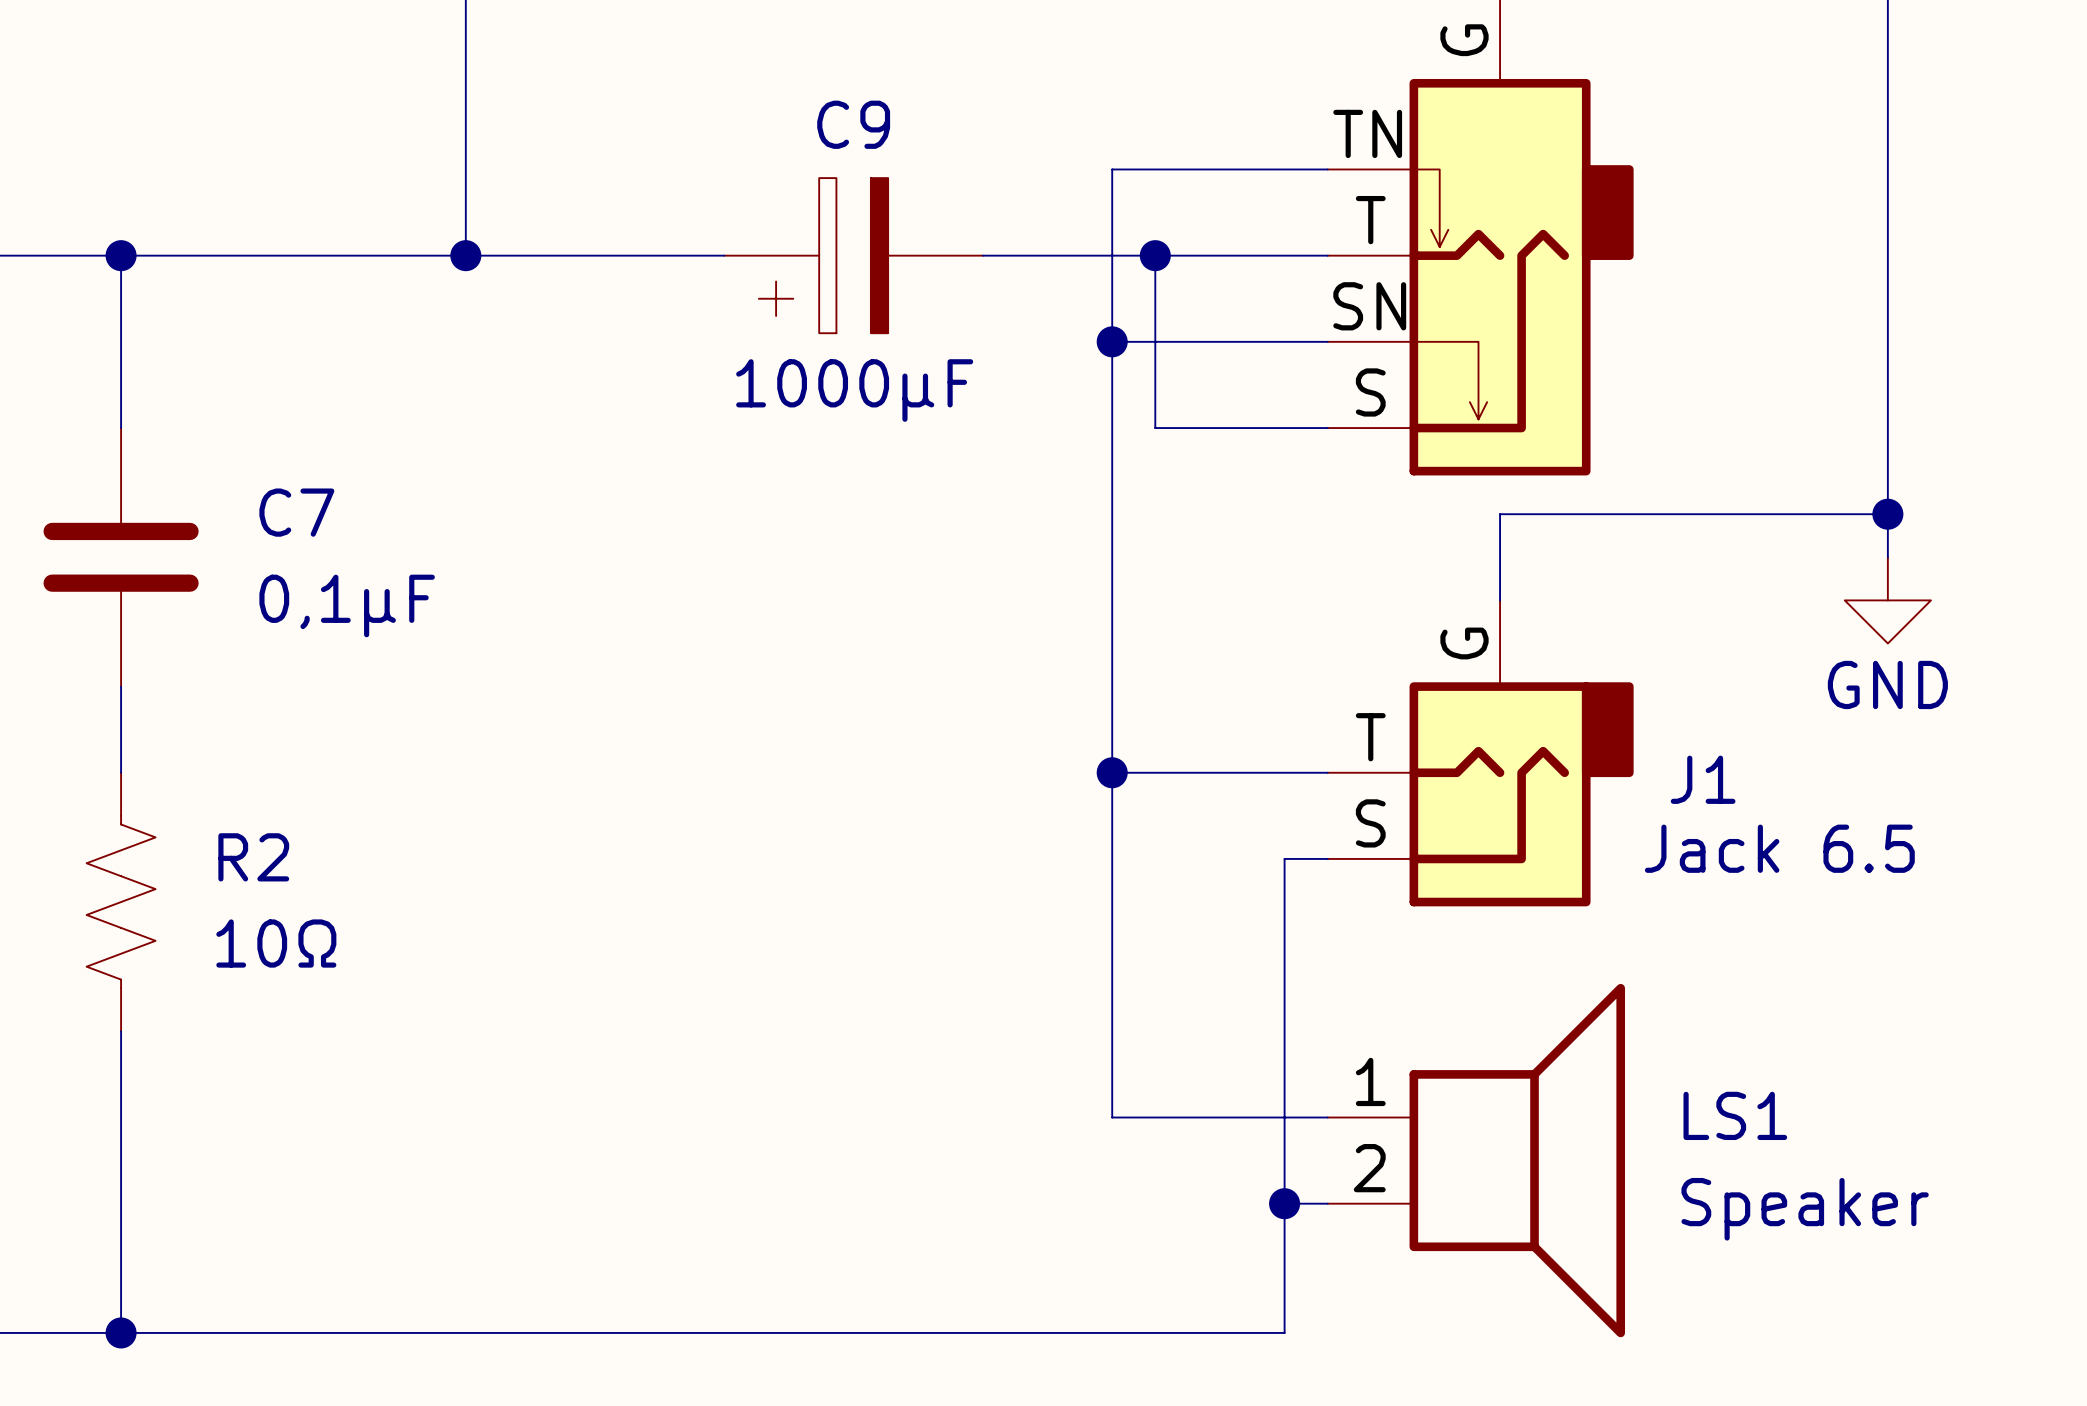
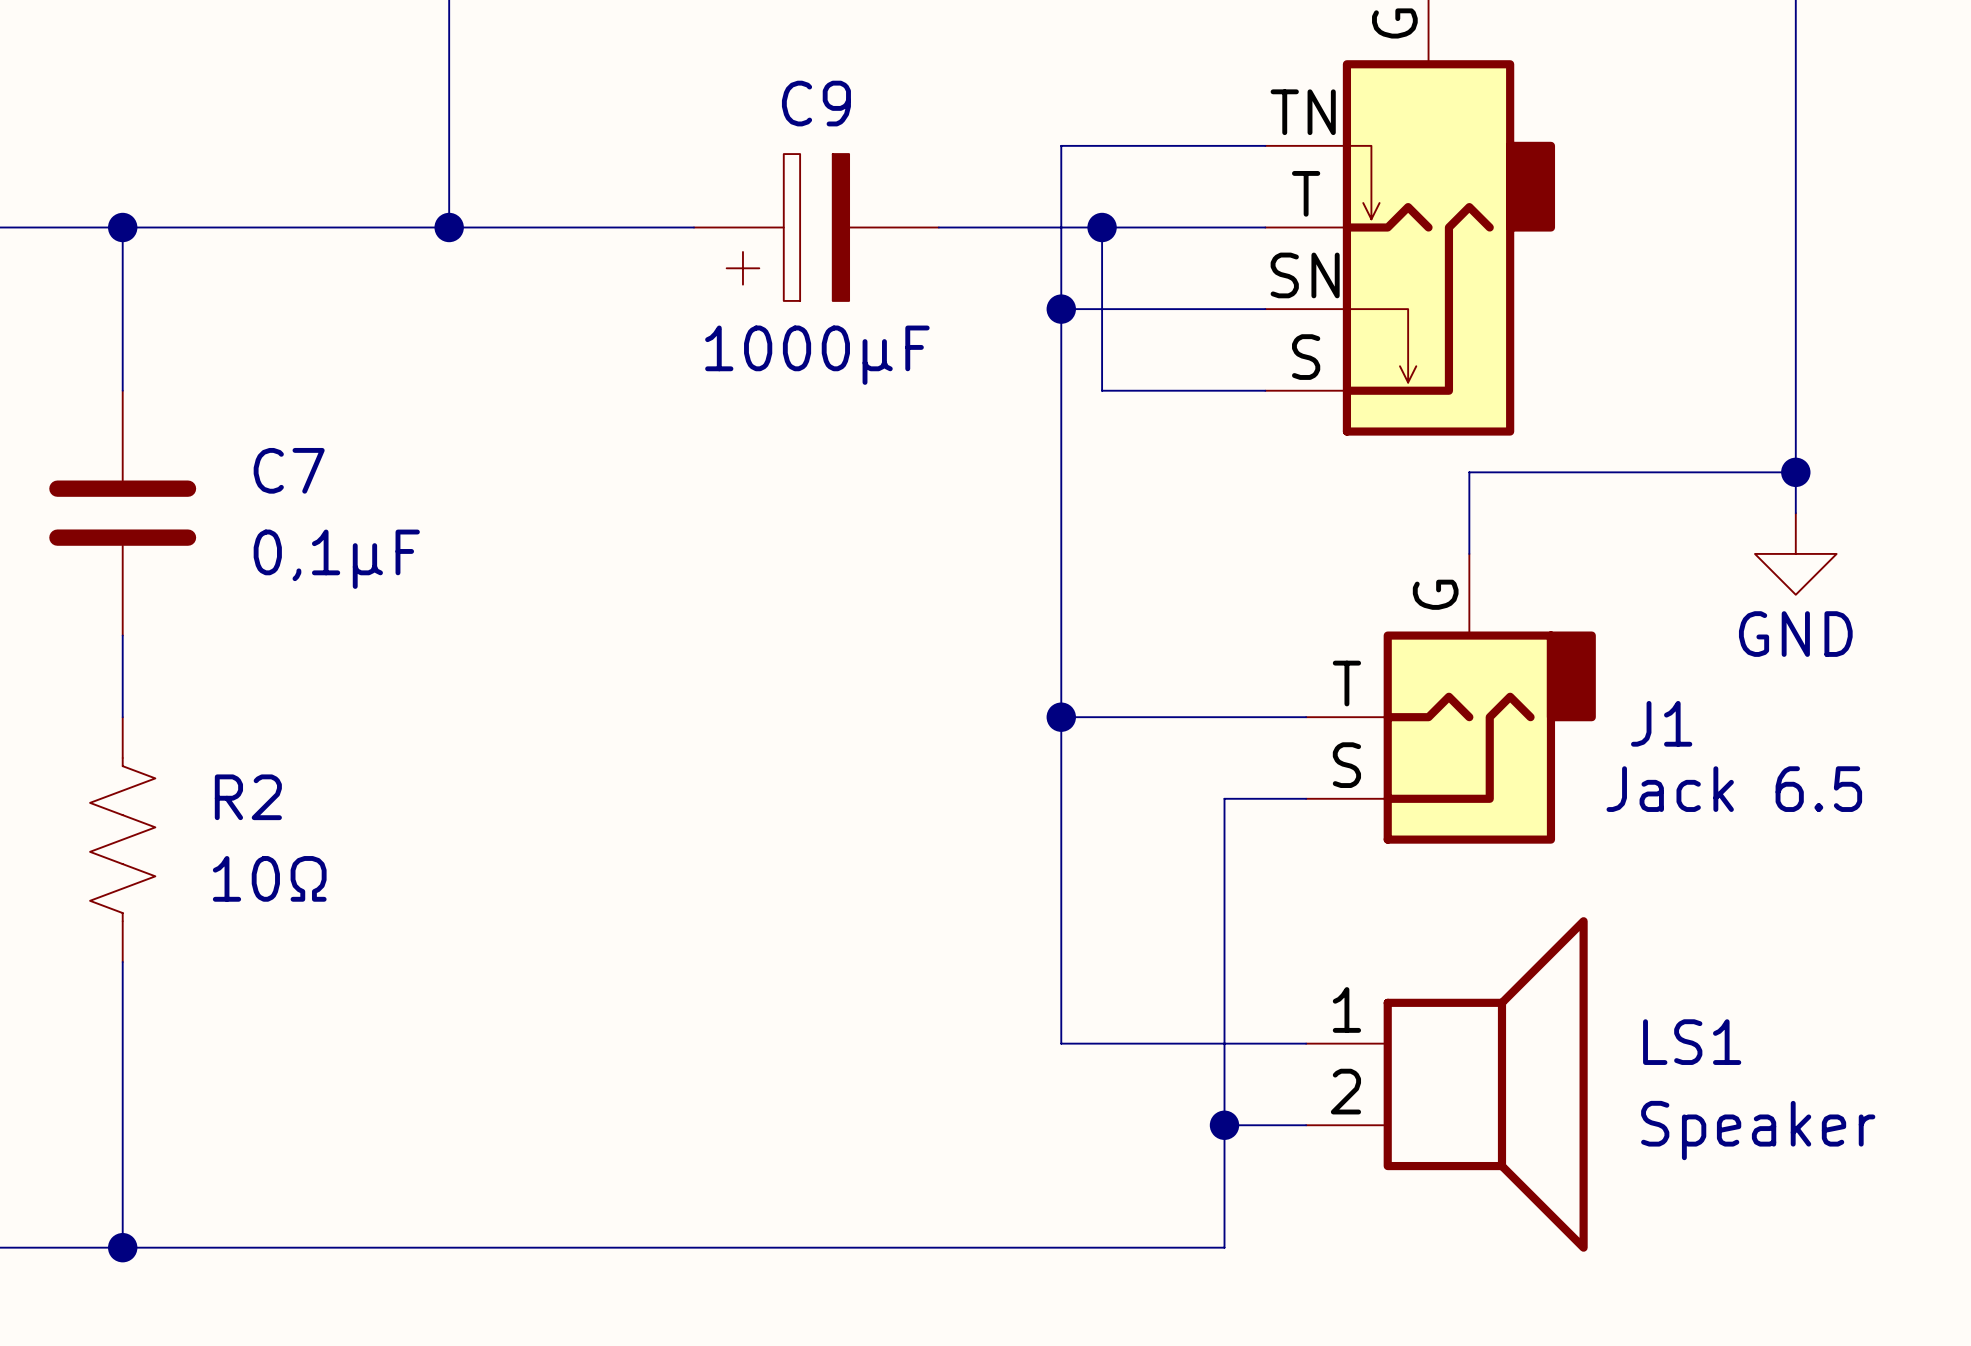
wire: (1543, 514) (1500, 514) (1500, 600) -> (1469, 472) (1469, 553)
J1 position: (1480, 753) -> (1450, 698)
LS1 position: (1476, 1160) -> (1446, 1084)

